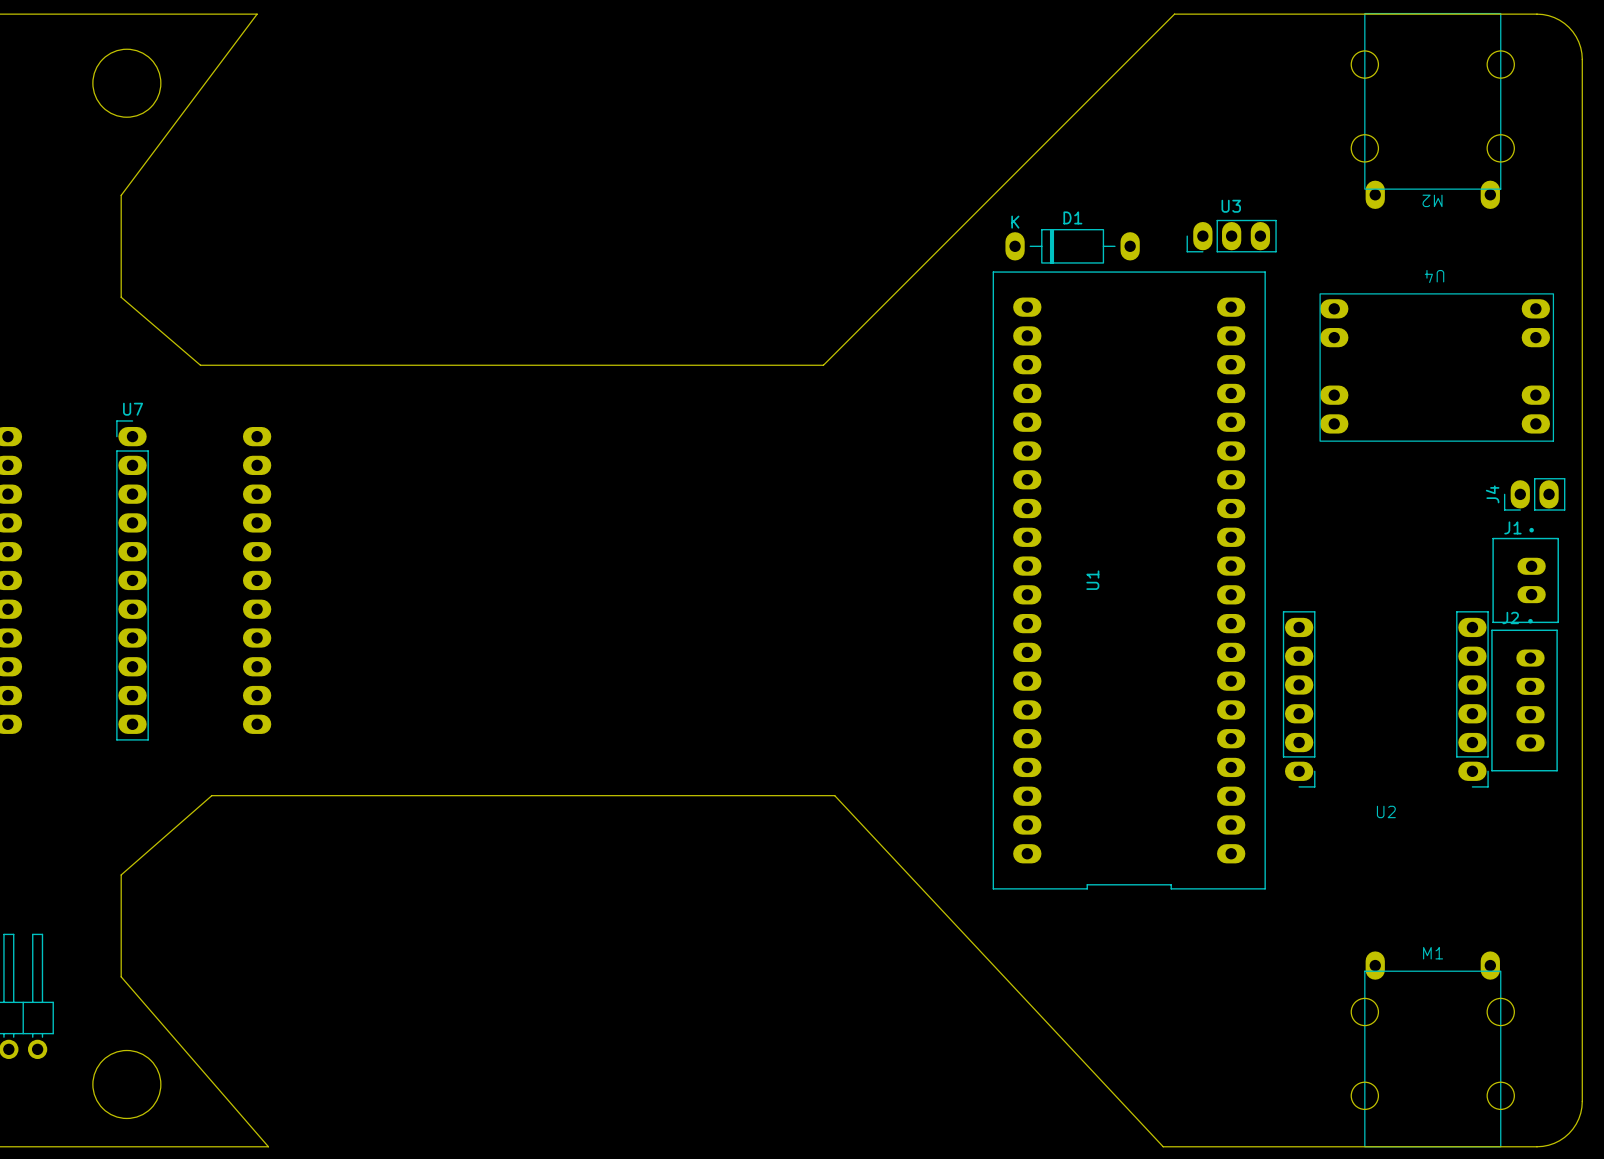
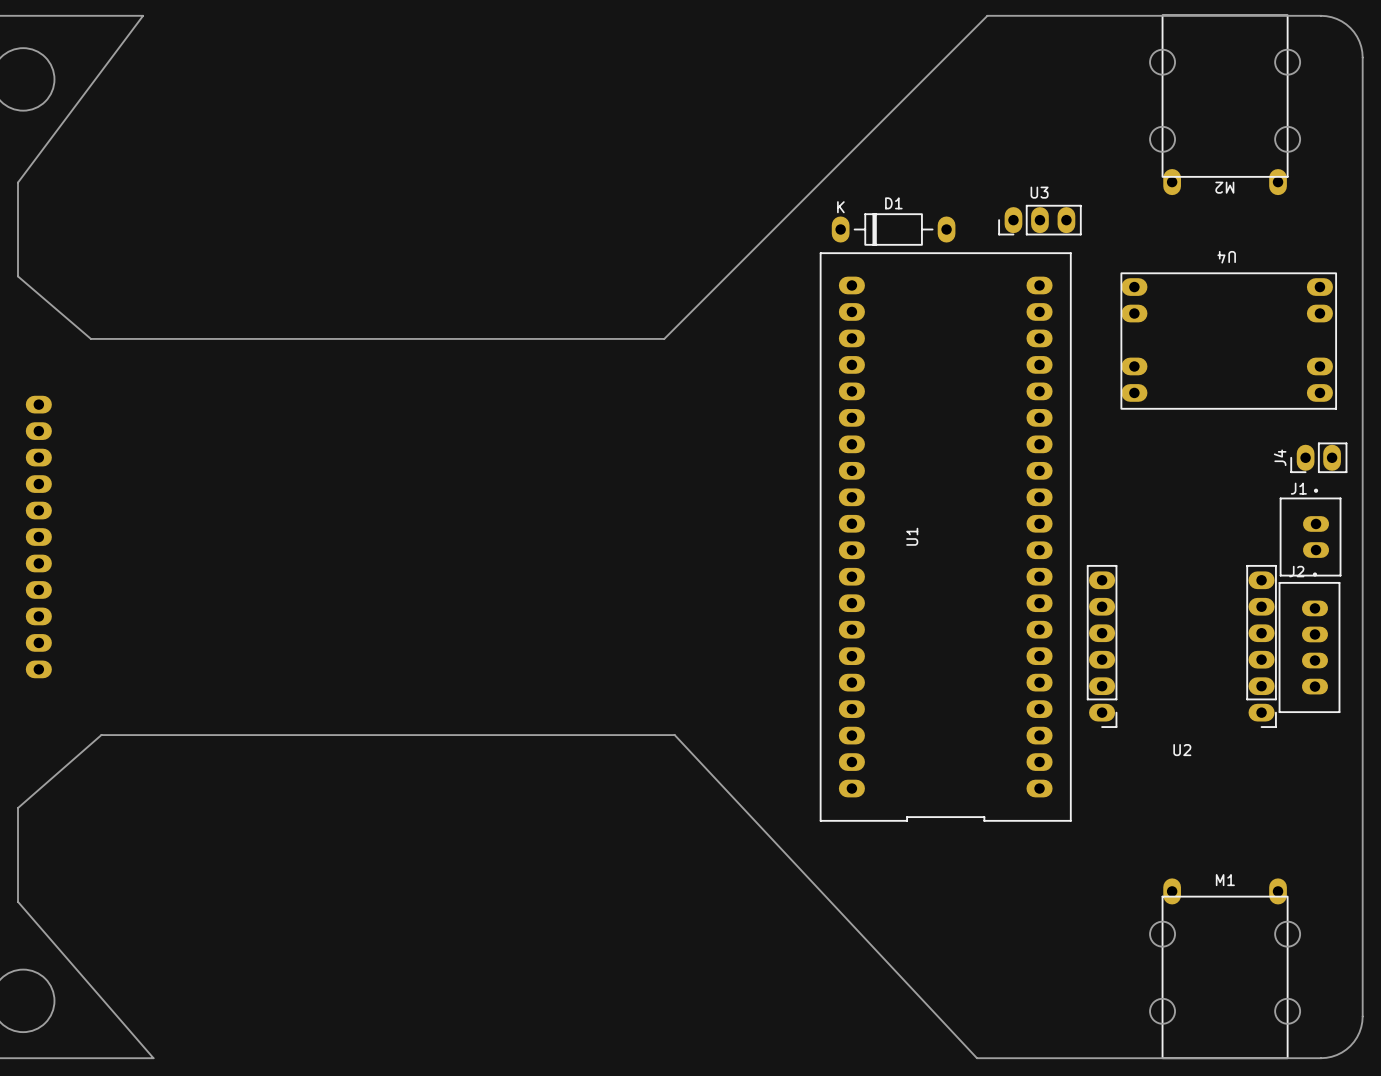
U7: (132, 580) -> none
part position: (257, 580) -> (38, 537)

